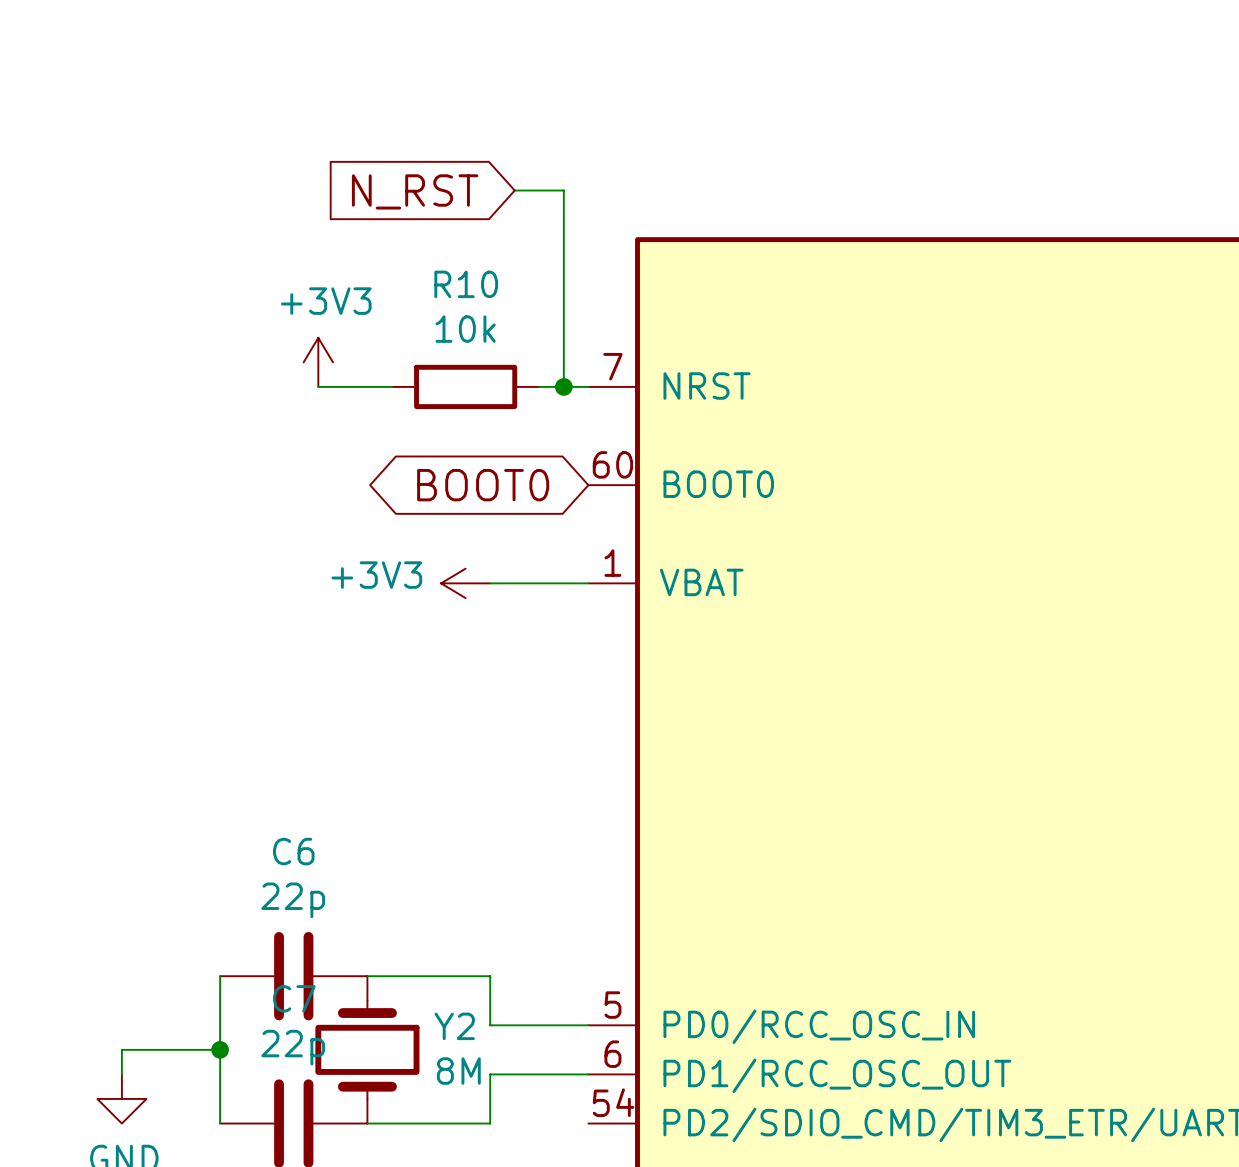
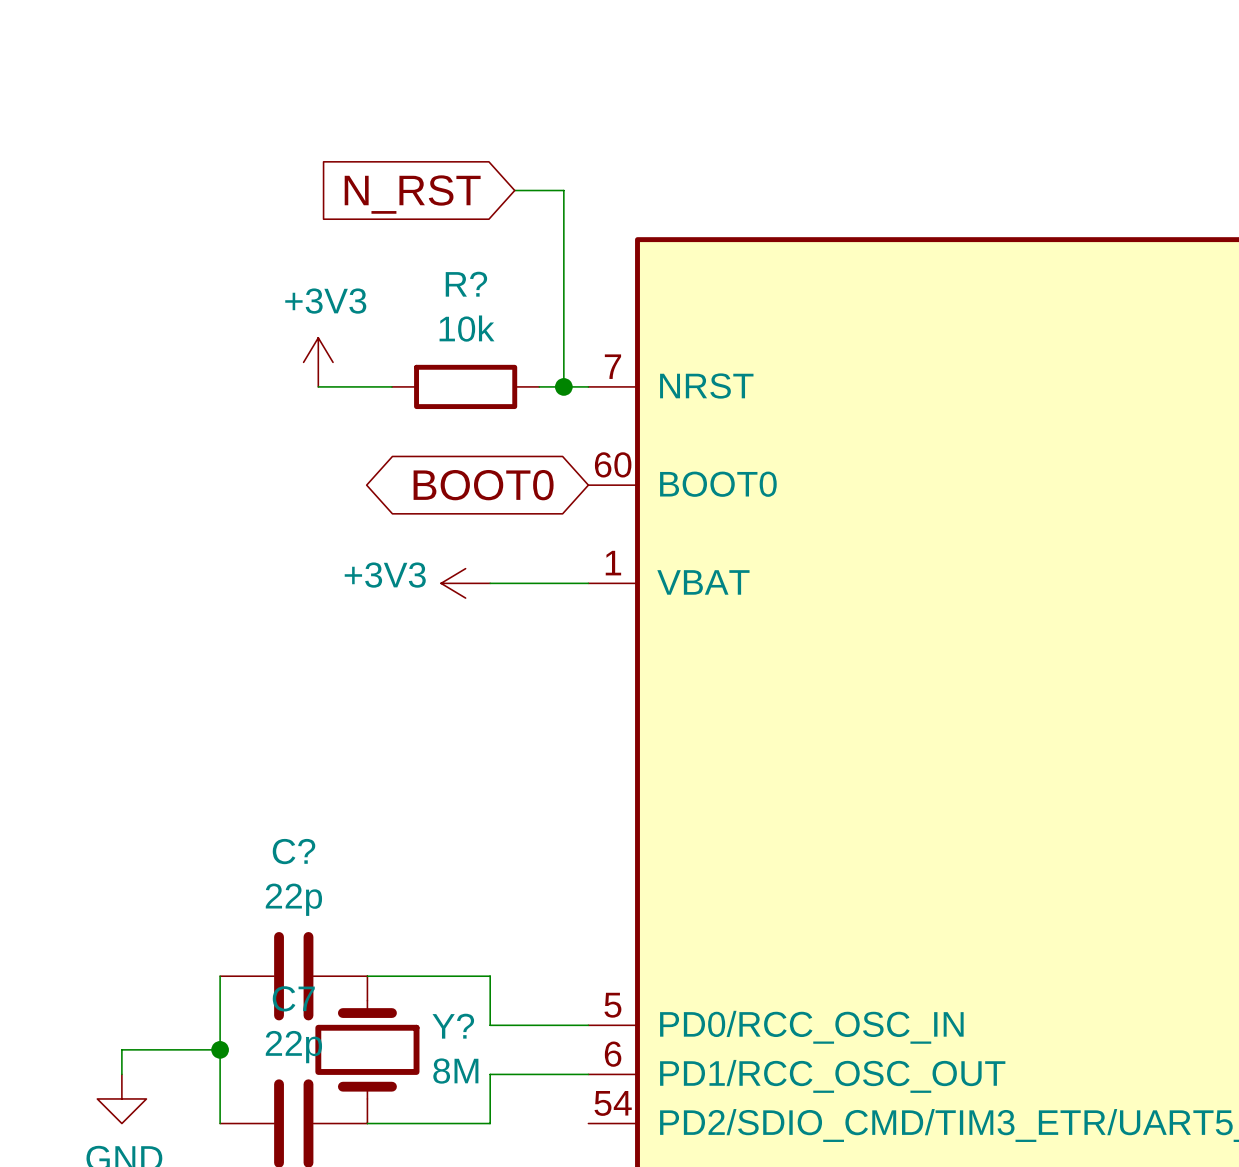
R10 name: R10 (466, 284) -> R? (466, 284)
C6 name: C6 (293, 851) -> C? (294, 851)
Y2 name: Y2 (454, 1026) -> Y? (453, 1026)

